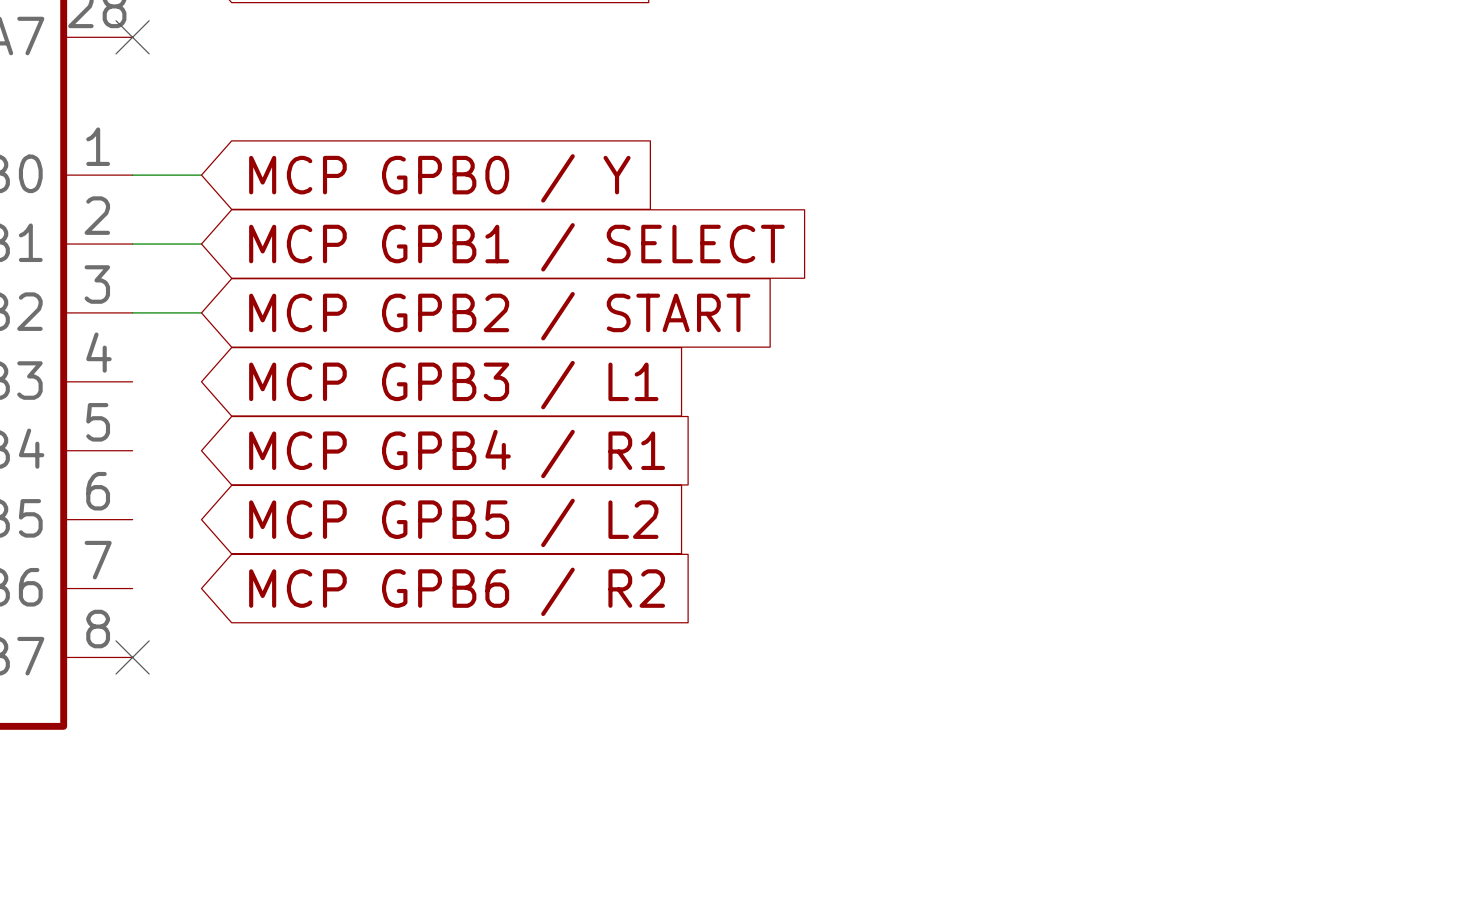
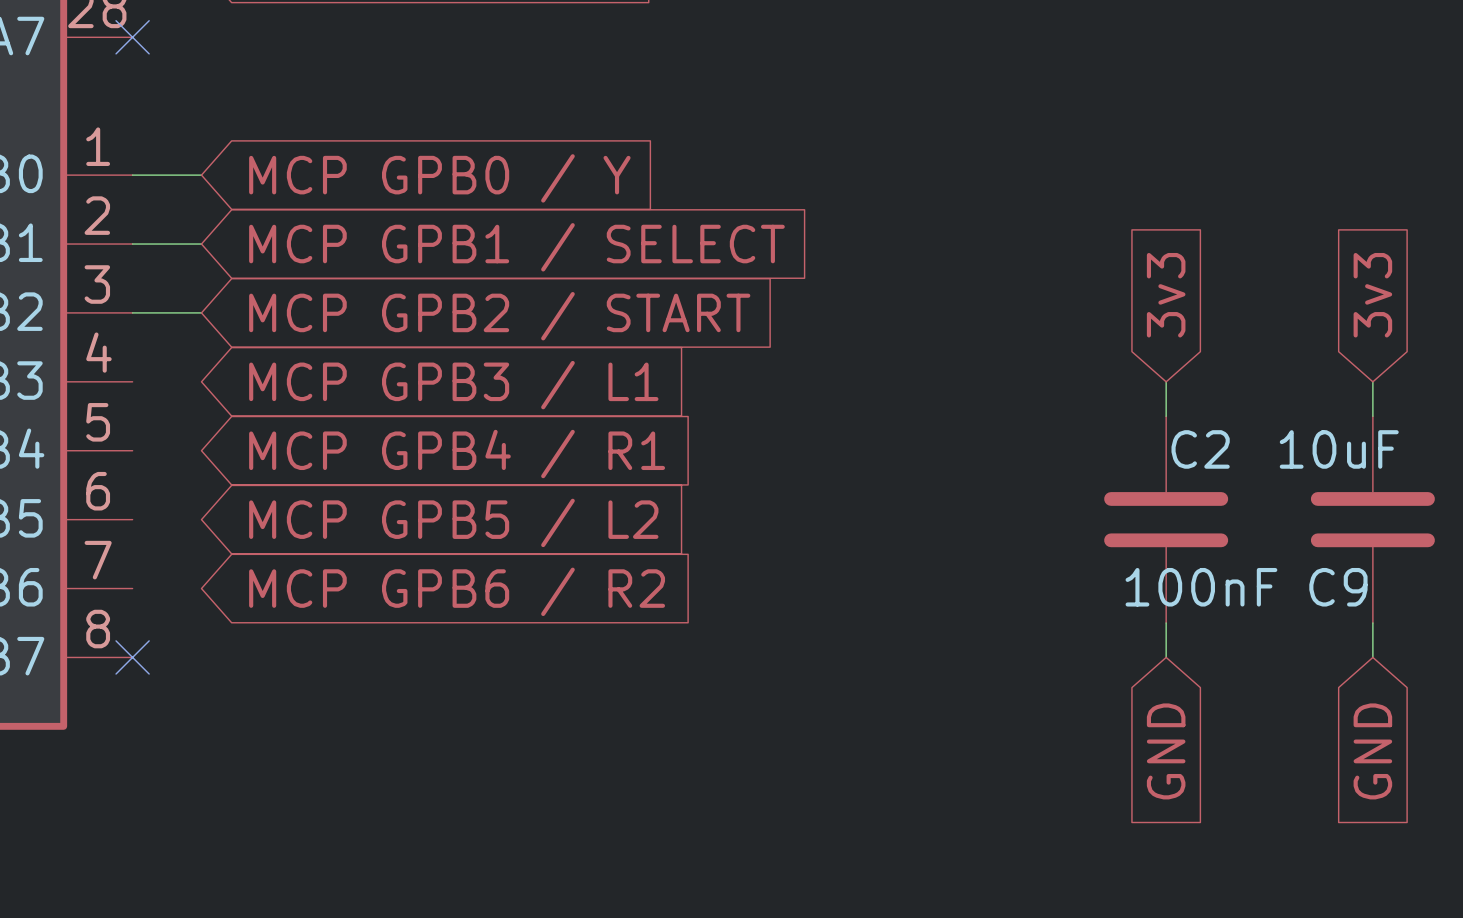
global label: none -> 3v3 (1166, 295)
global label: none -> 3v3 (1372, 295)
wire: none -> (1166, 381) (1166, 416)
wire: none -> (1372, 381) (1372, 416)
C2: none -> 100nF (1166, 519)
C9: none -> 10uF (1372, 519)
wire: none -> (1166, 623) (1166, 657)
wire: none -> (1372, 623) (1372, 657)
global label: none -> GND (1166, 751)
global label: none -> GND (1372, 751)

